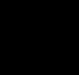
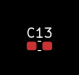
C13: none -> (39, 45)

